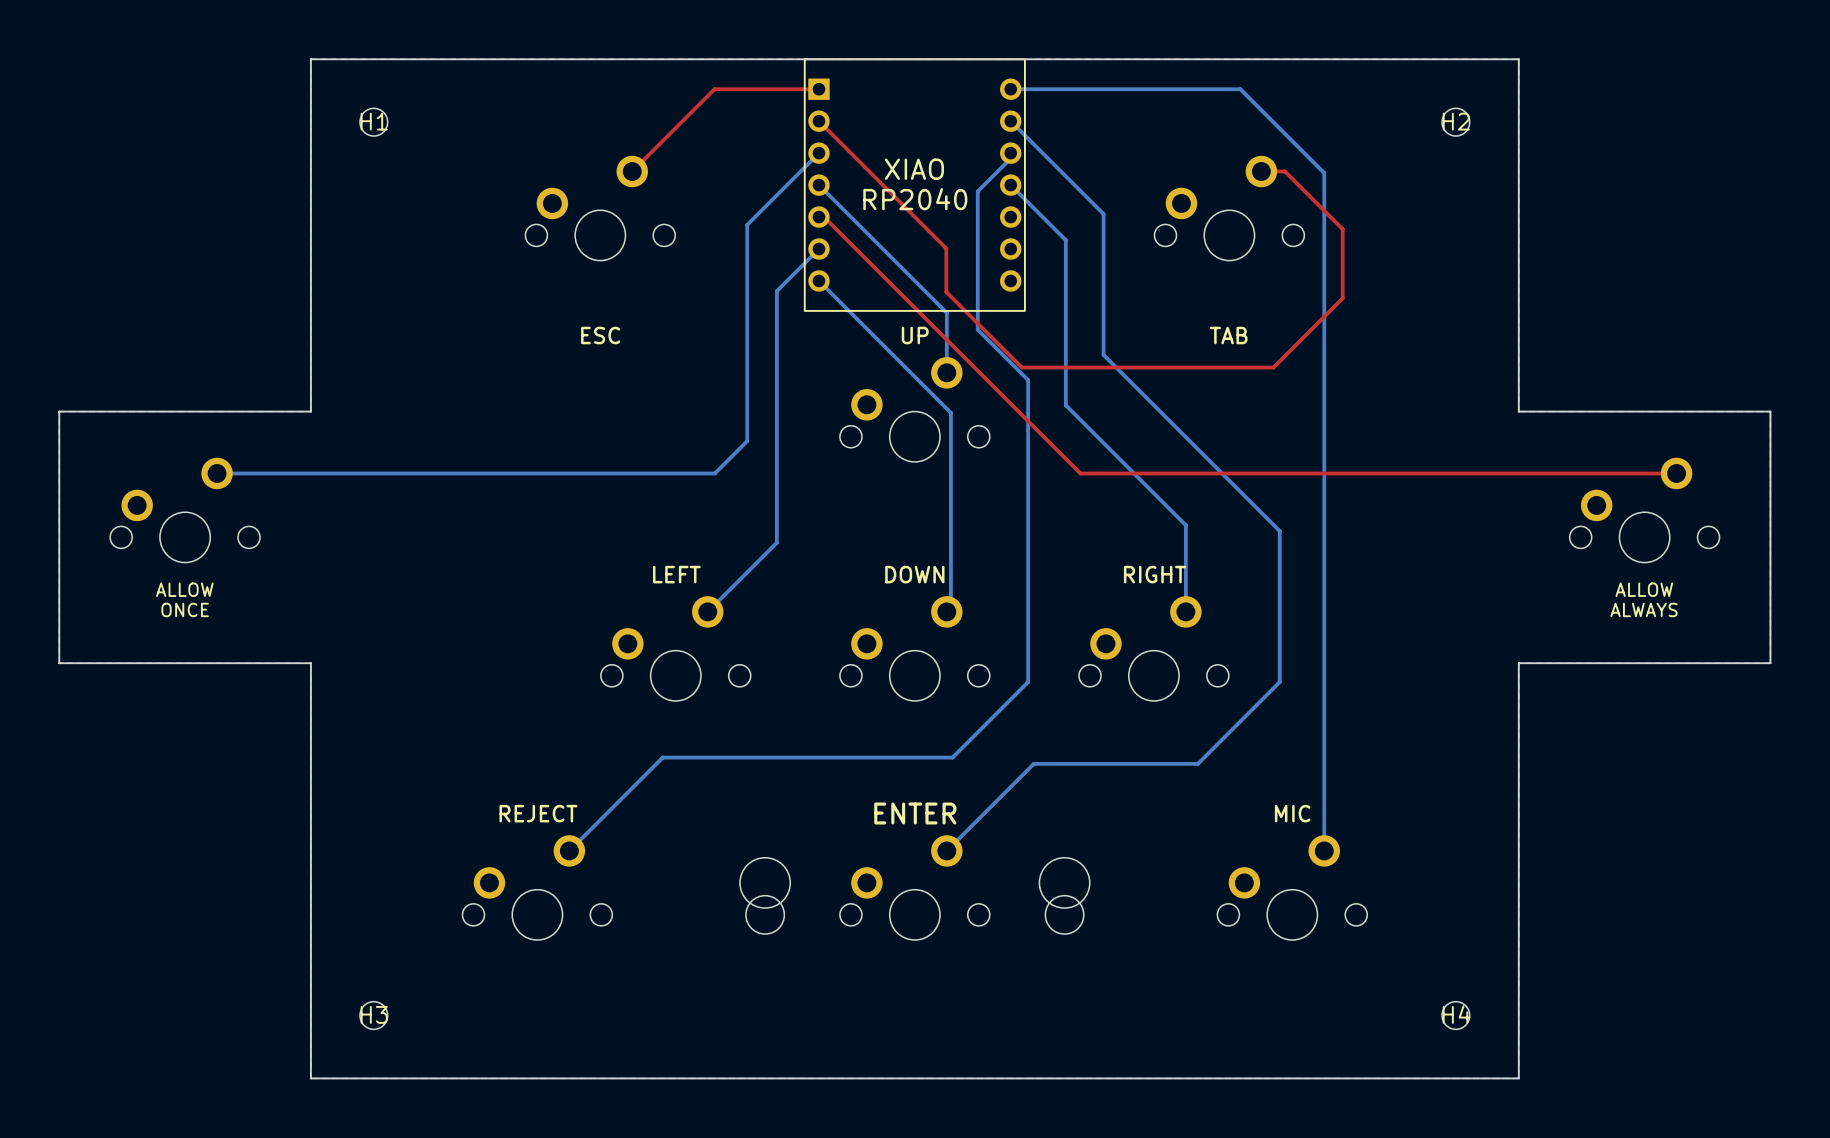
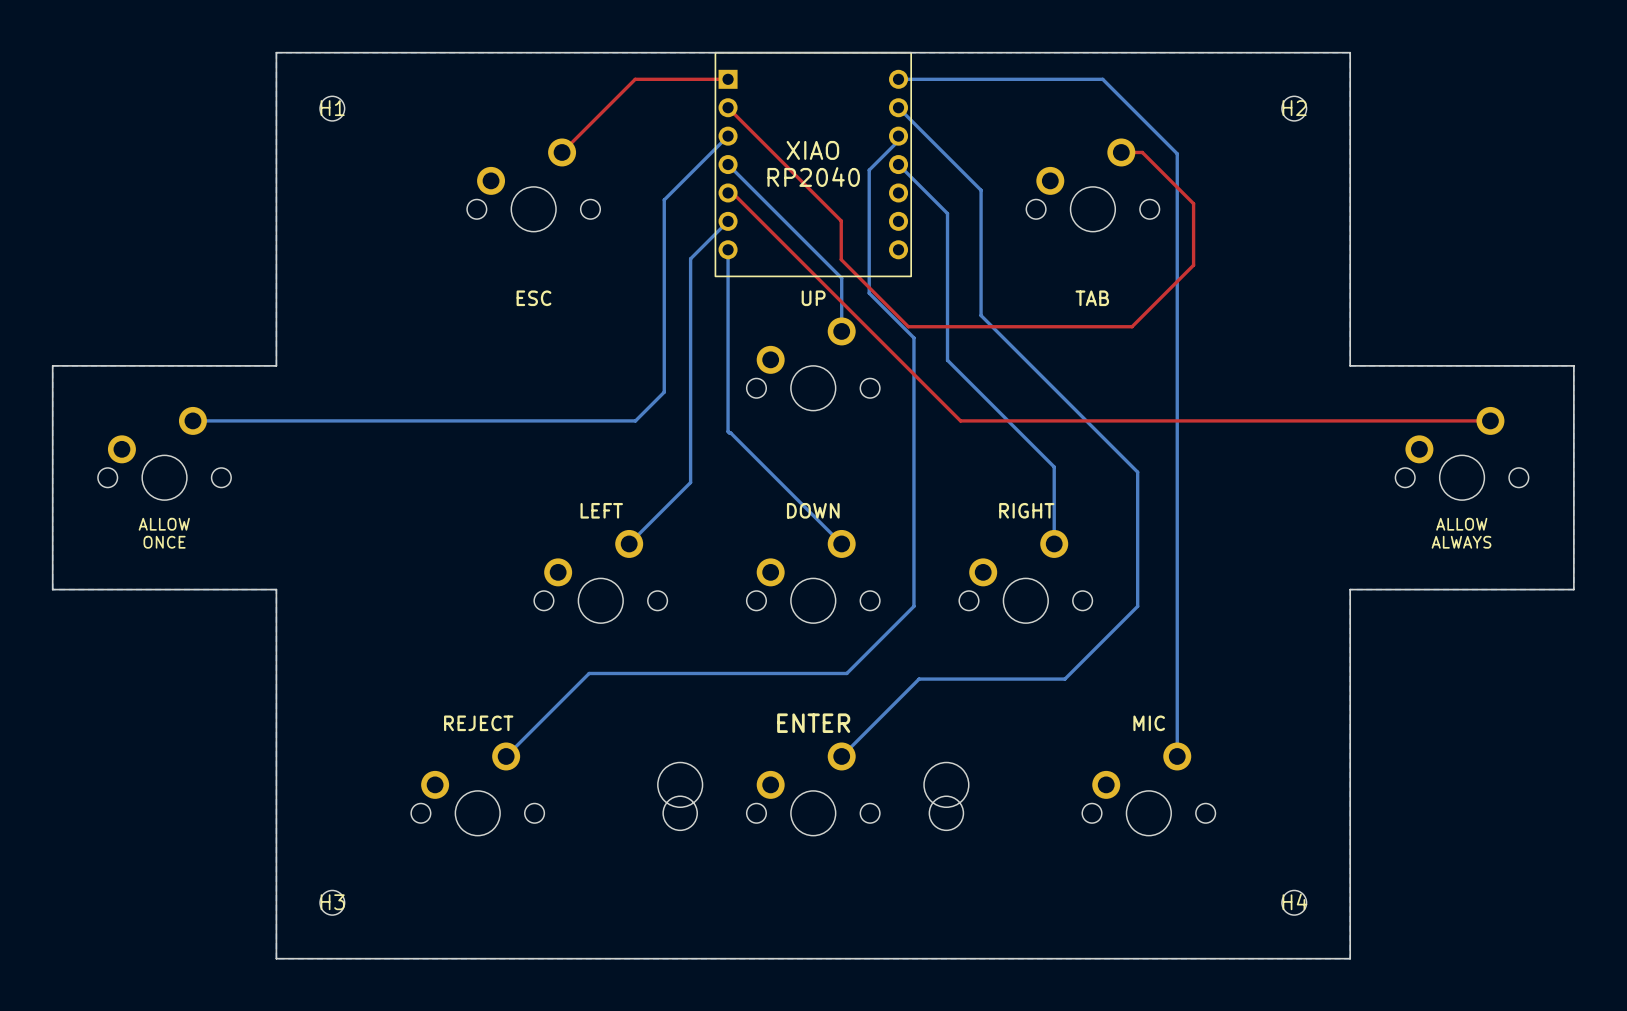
bottom track: (818, 280) (950, 412) (950, 607) -> (728, 249) (728, 431) (841, 543)

